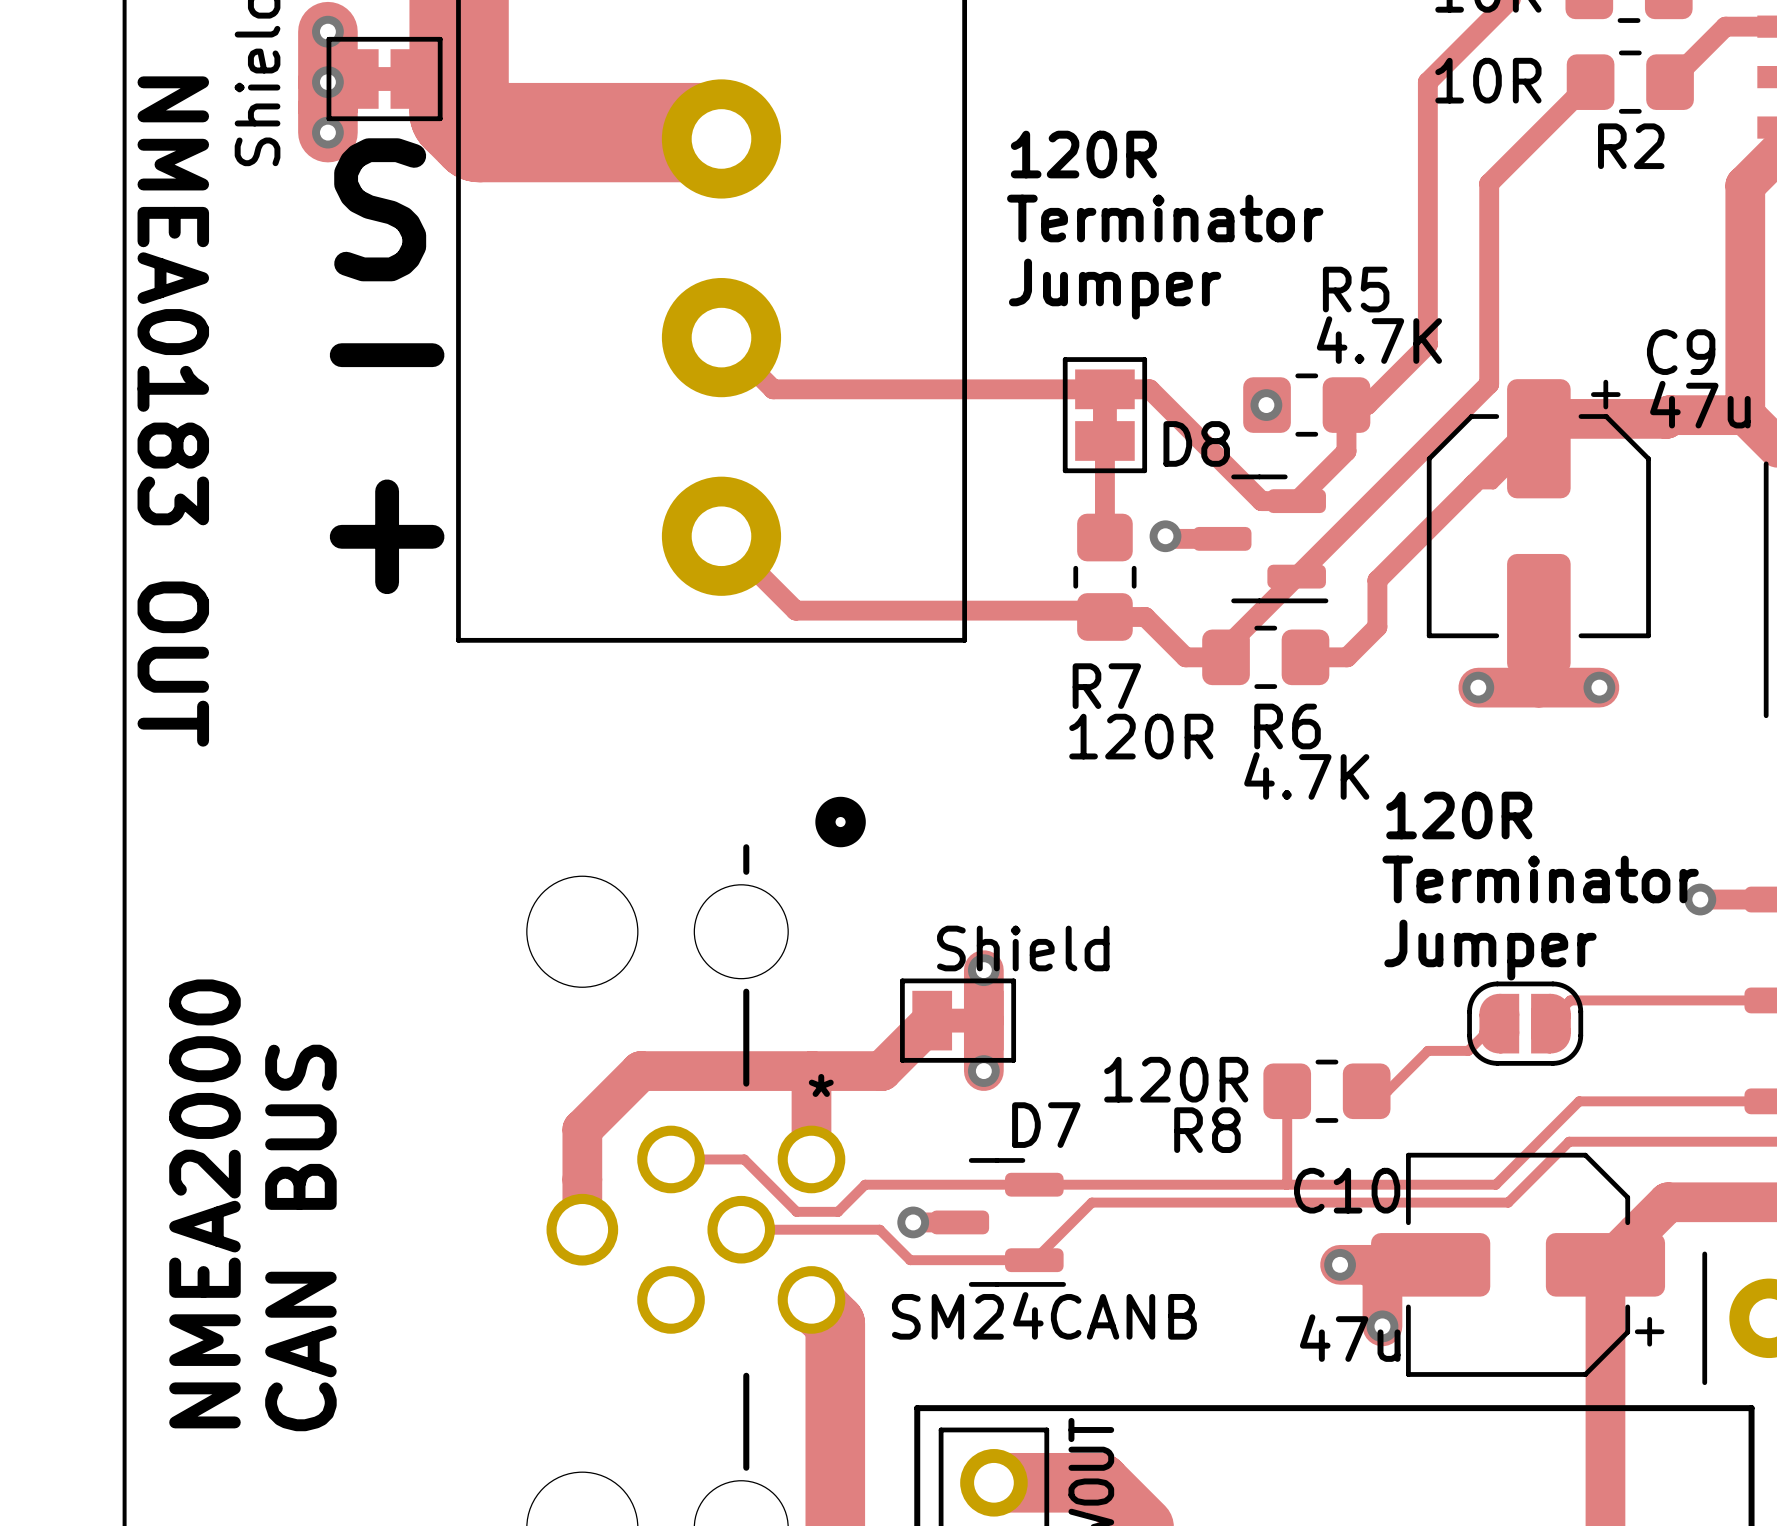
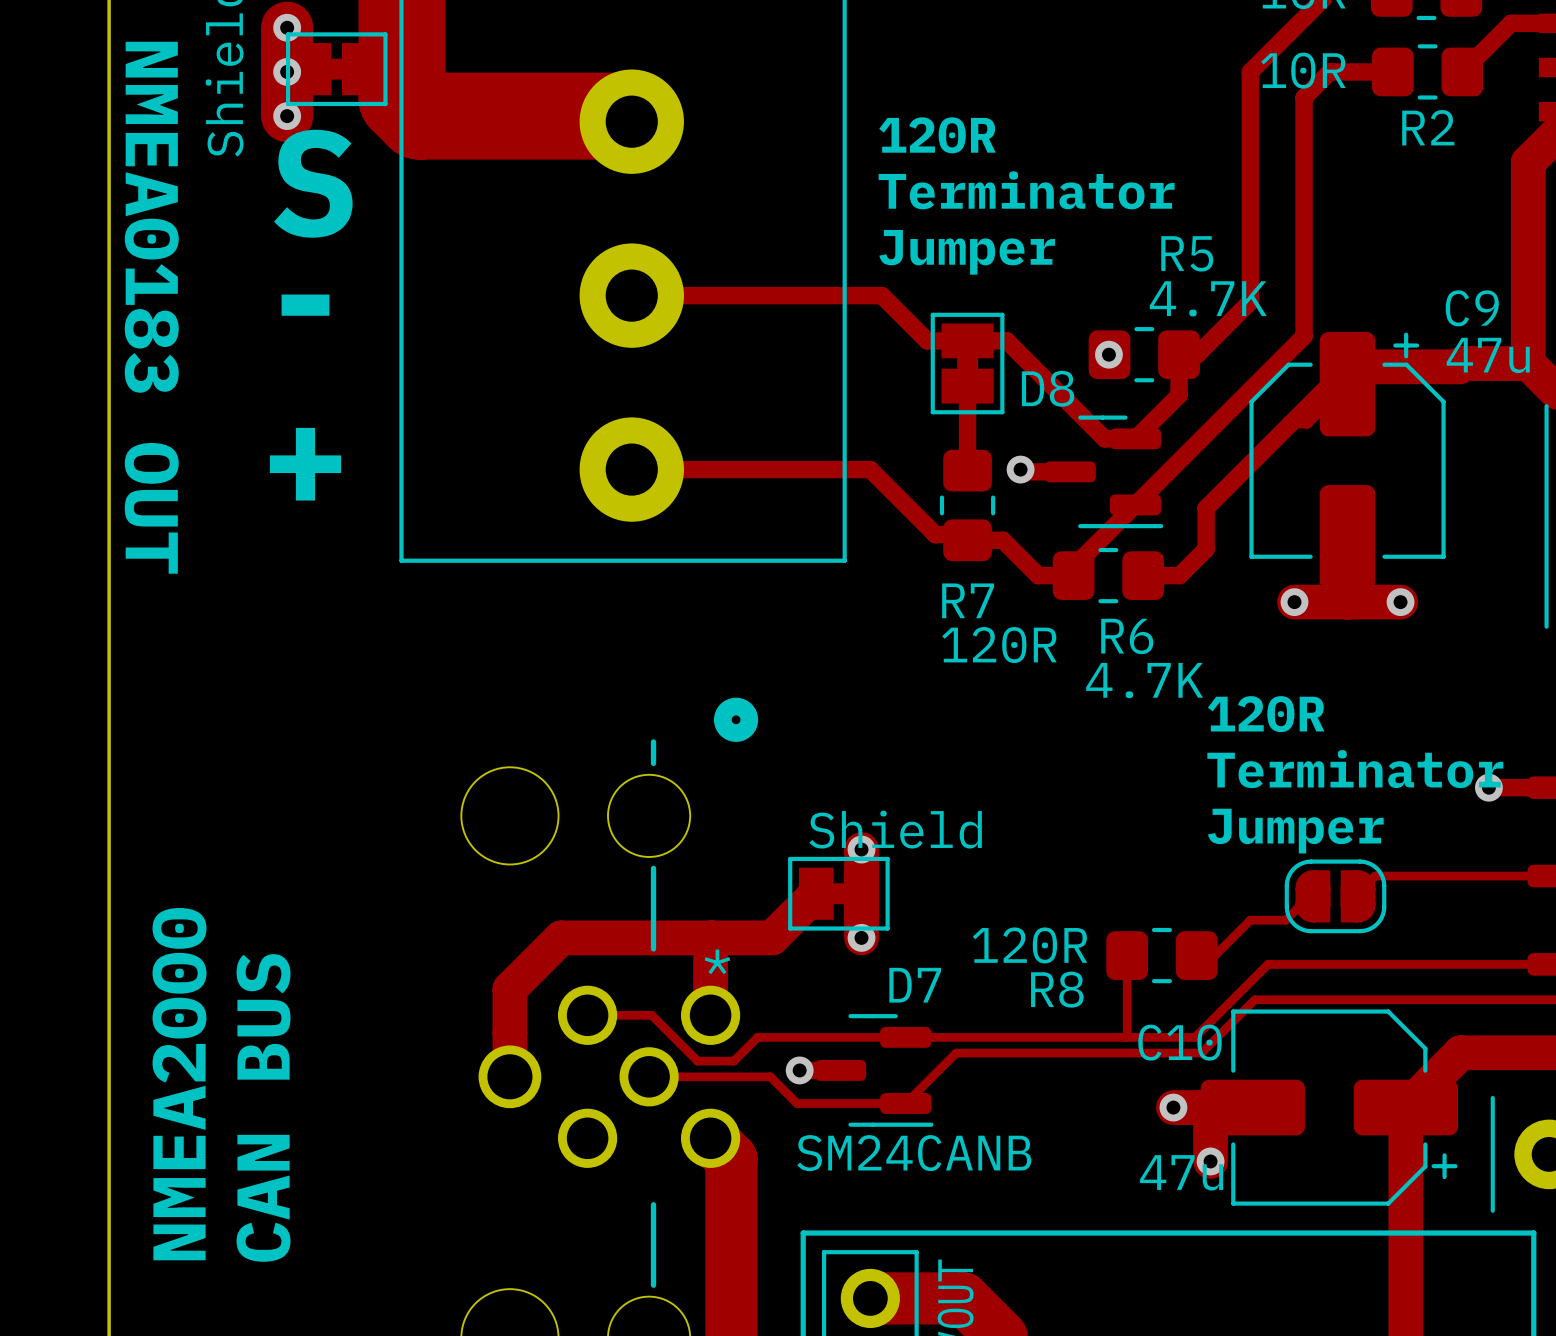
top track: (1590, 82) (1489, 183) -> (1392, 71) (1329, 71) (1304, 97) (1304, 160)
top track: (721, 337) (773, 389) (1058, 389) -> (631, 295) (881, 295) (927, 340)
top track: (721, 536) (795, 610) (1068, 610) -> (631, 469) (870, 469) (935, 534)
top track: (1579, 1101) (1495, 1184) (1364, 1184) -> (1382, 964) (1267, 964) (1195, 1037)
top track: (1569, 1141) (1508, 1202) (1372, 1202) -> (1374, 999) (1254, 999) (1201, 1053)

